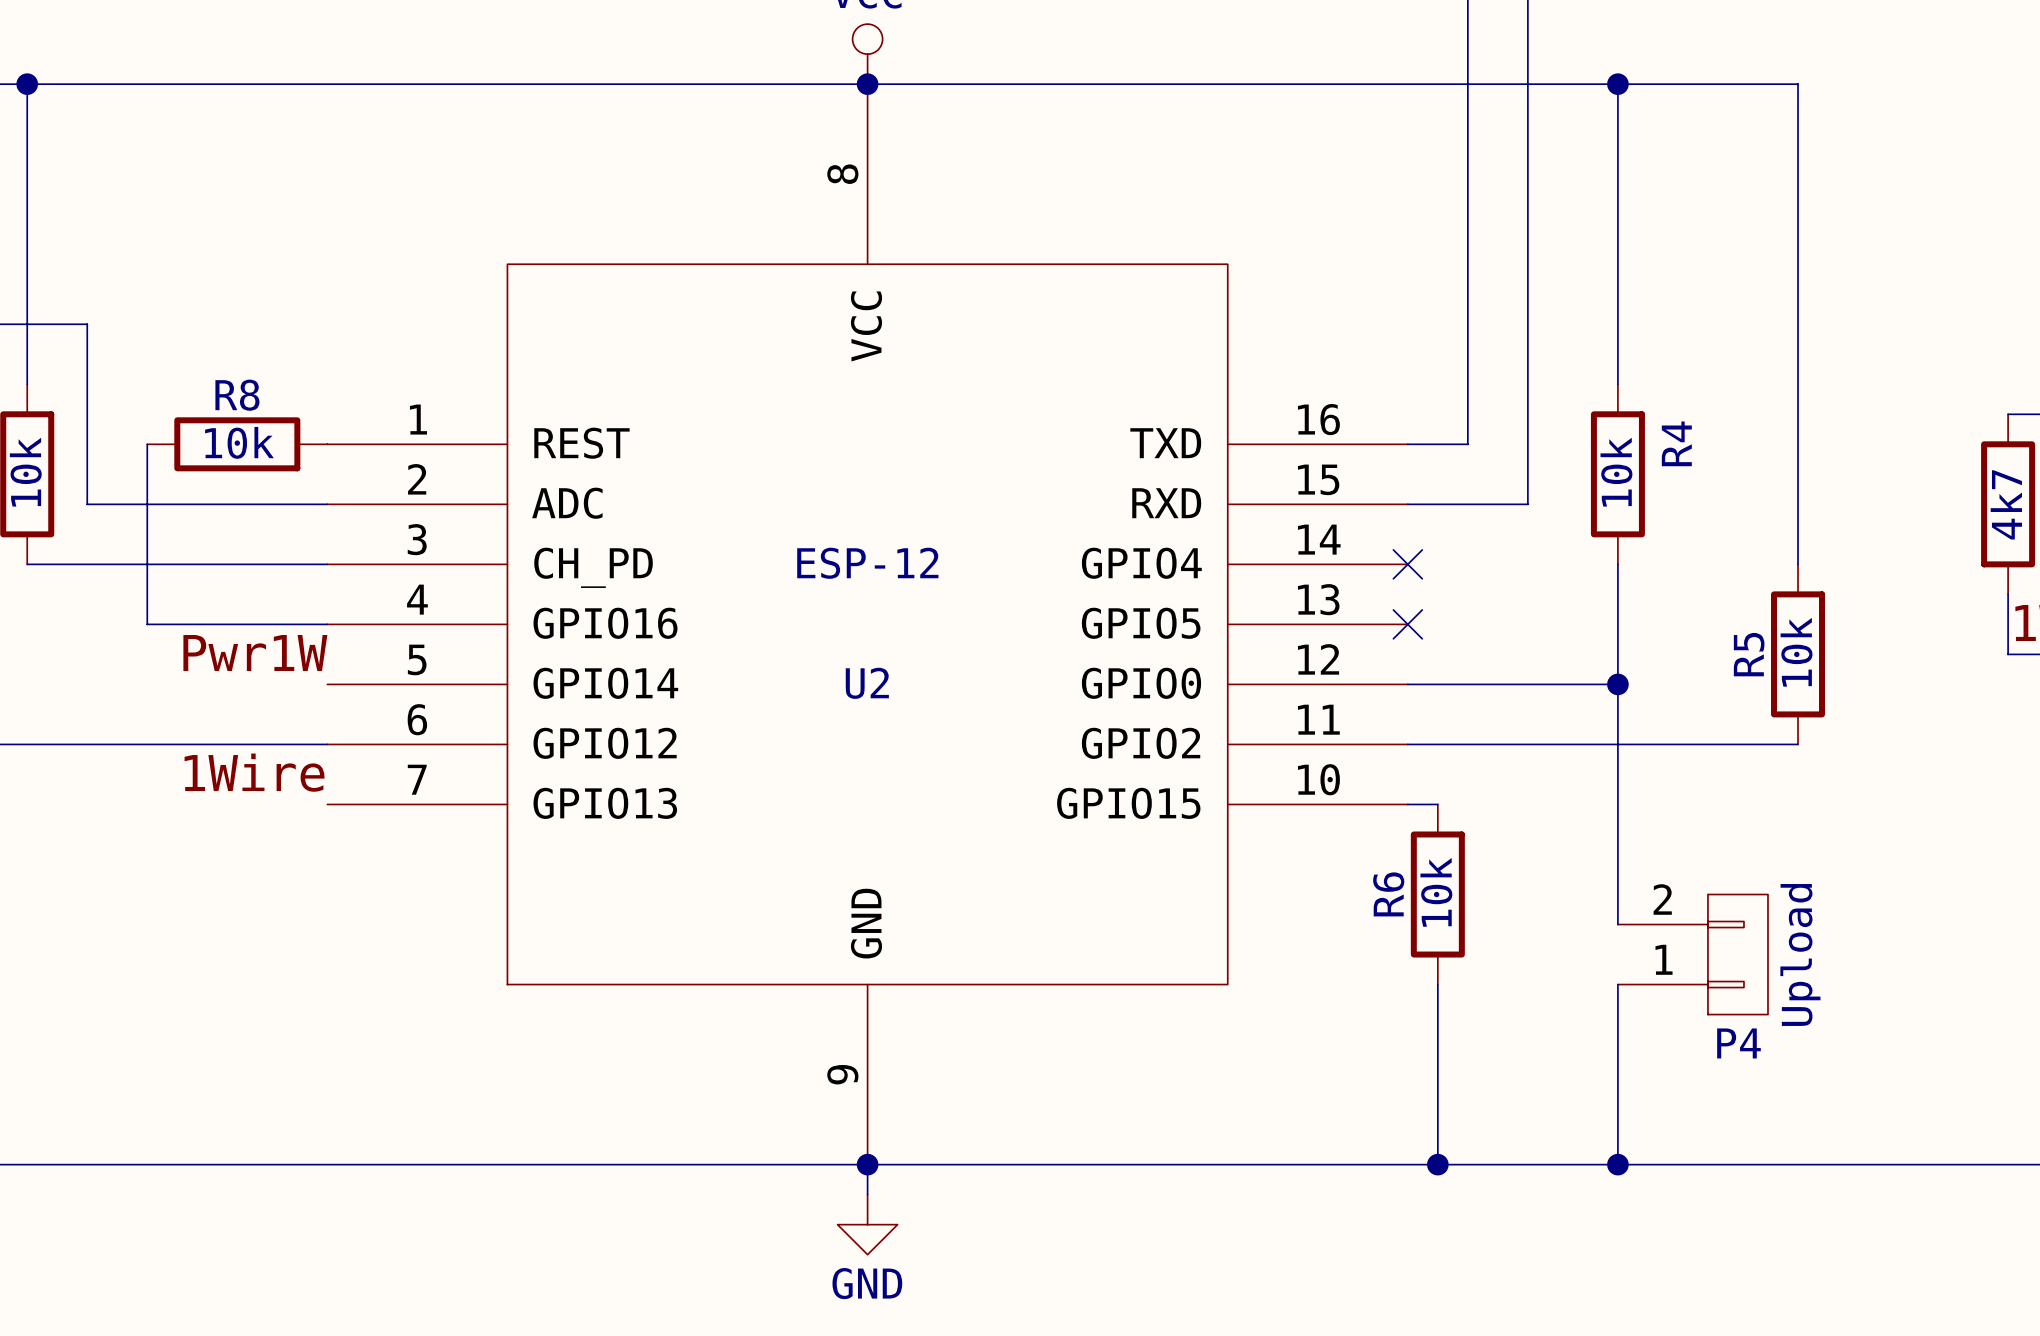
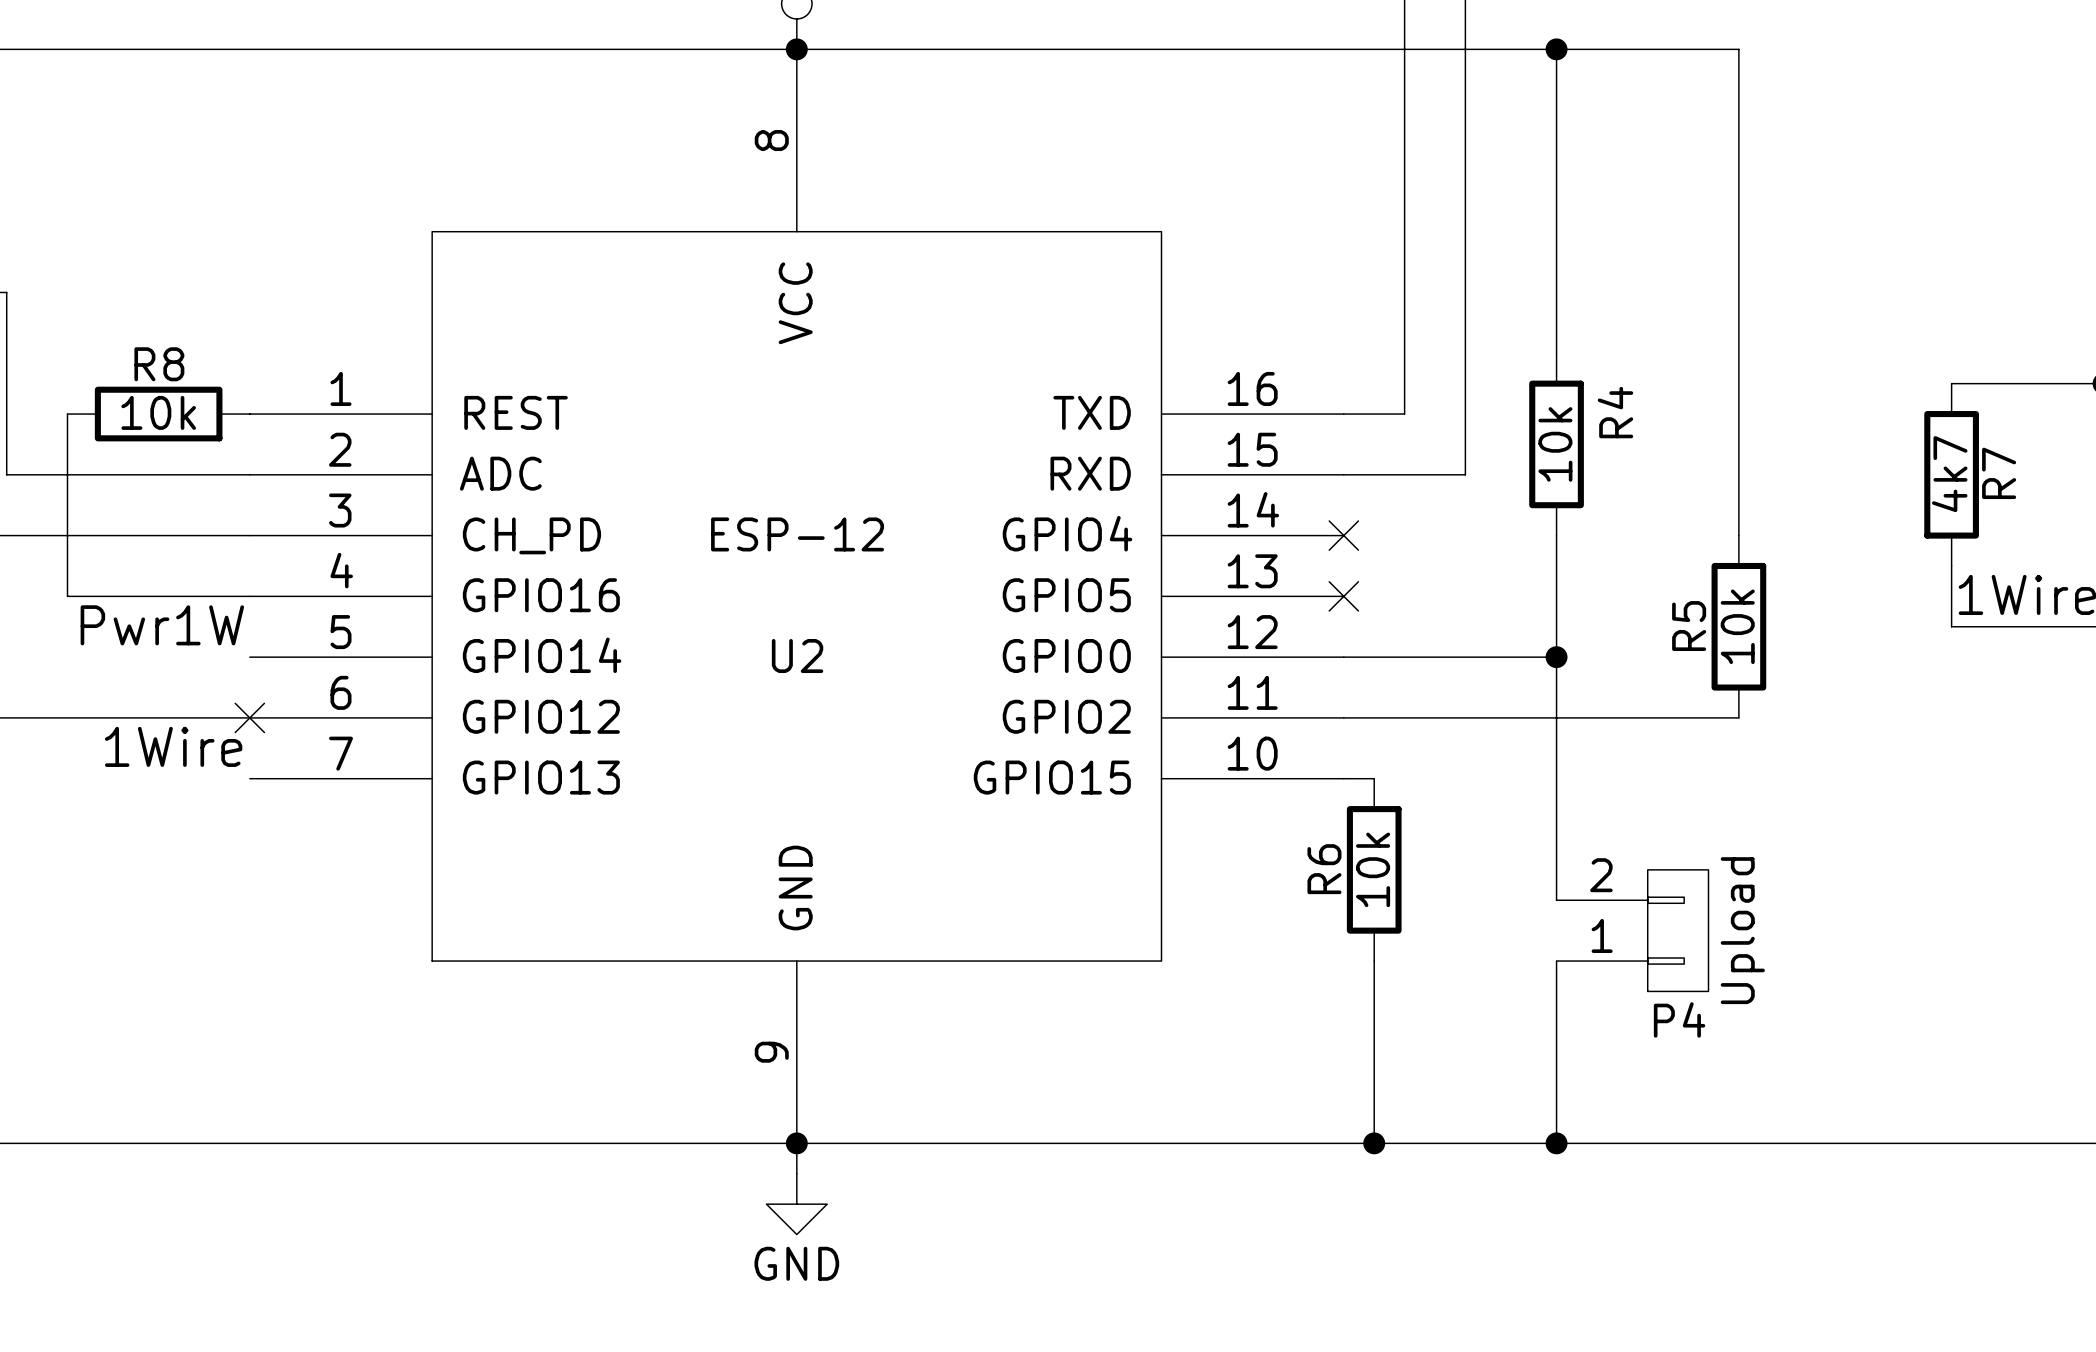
no-connect mark: none -> (249, 717)

